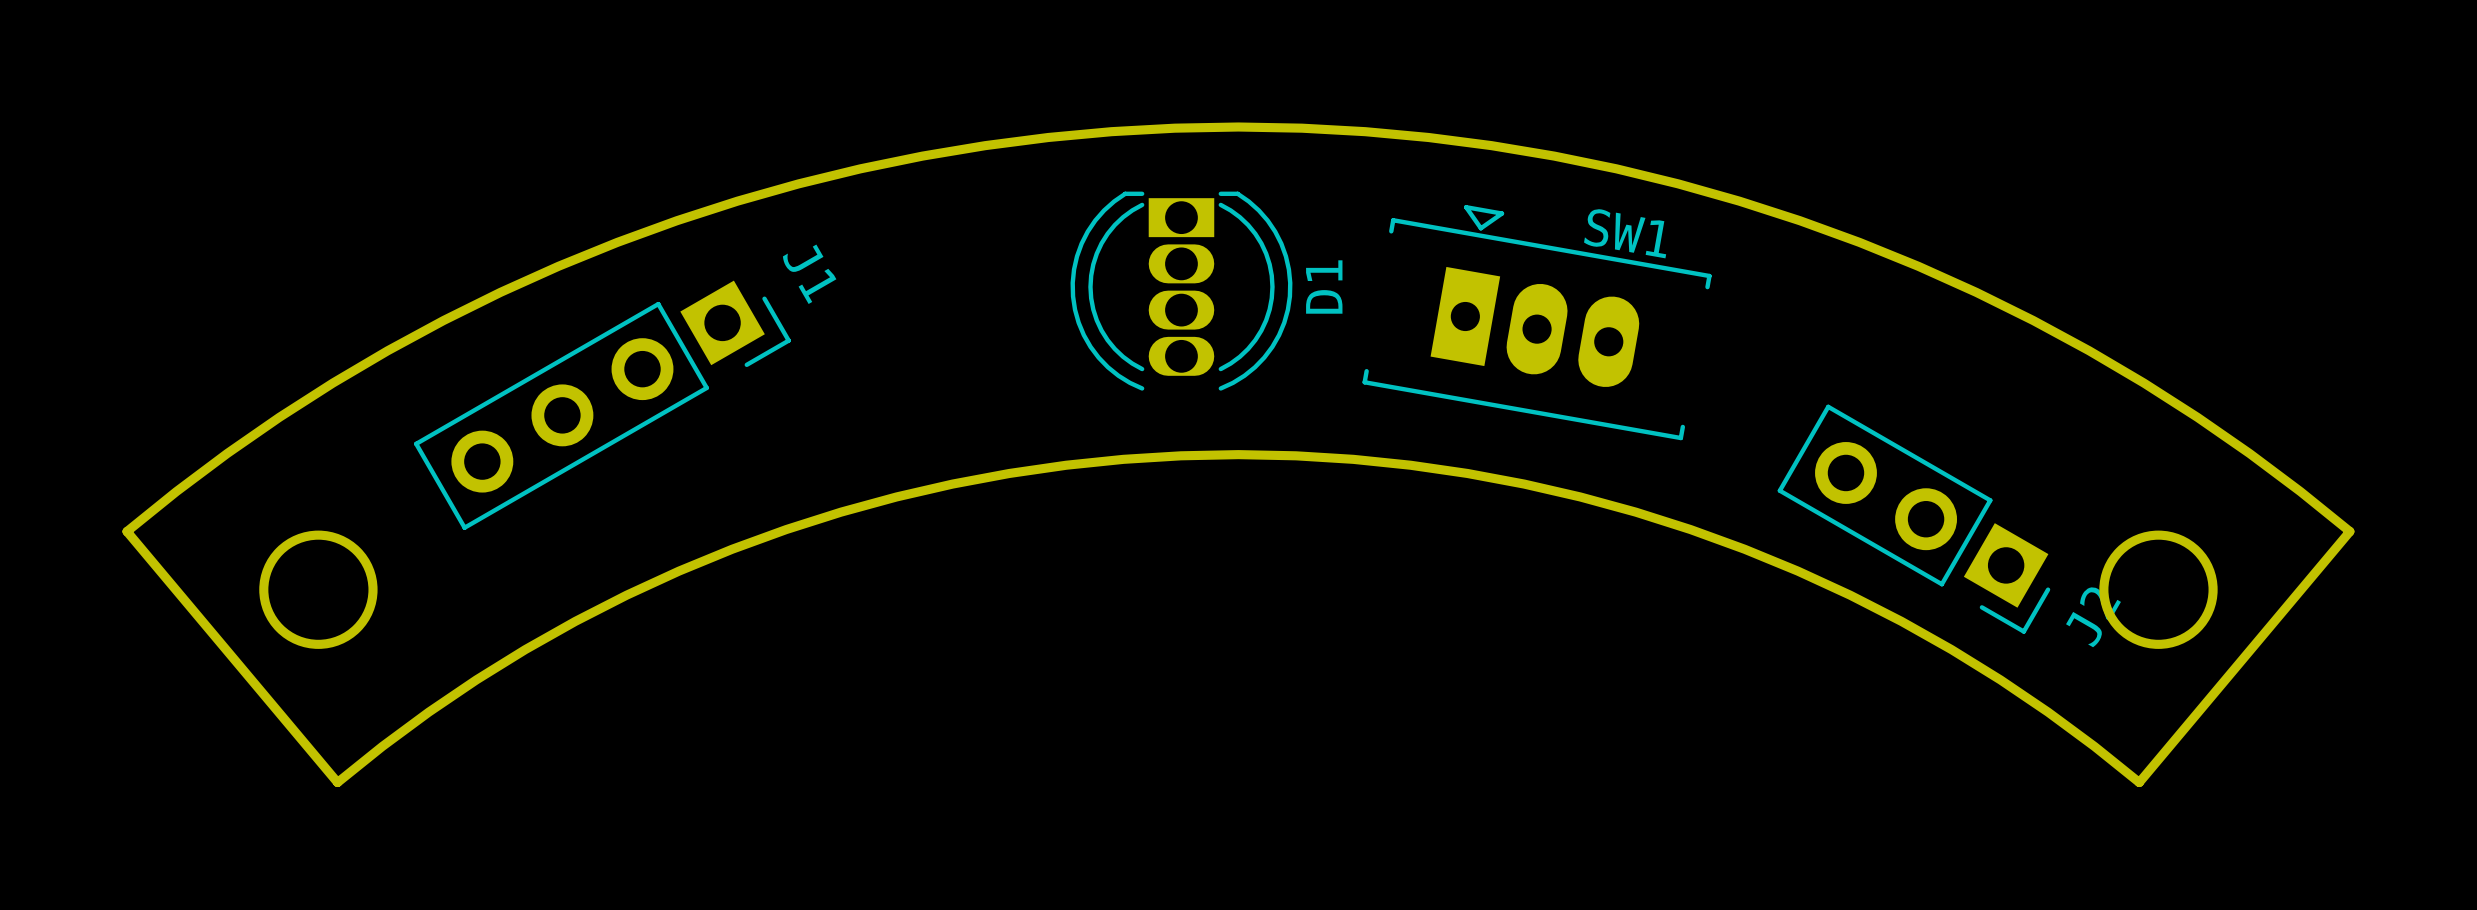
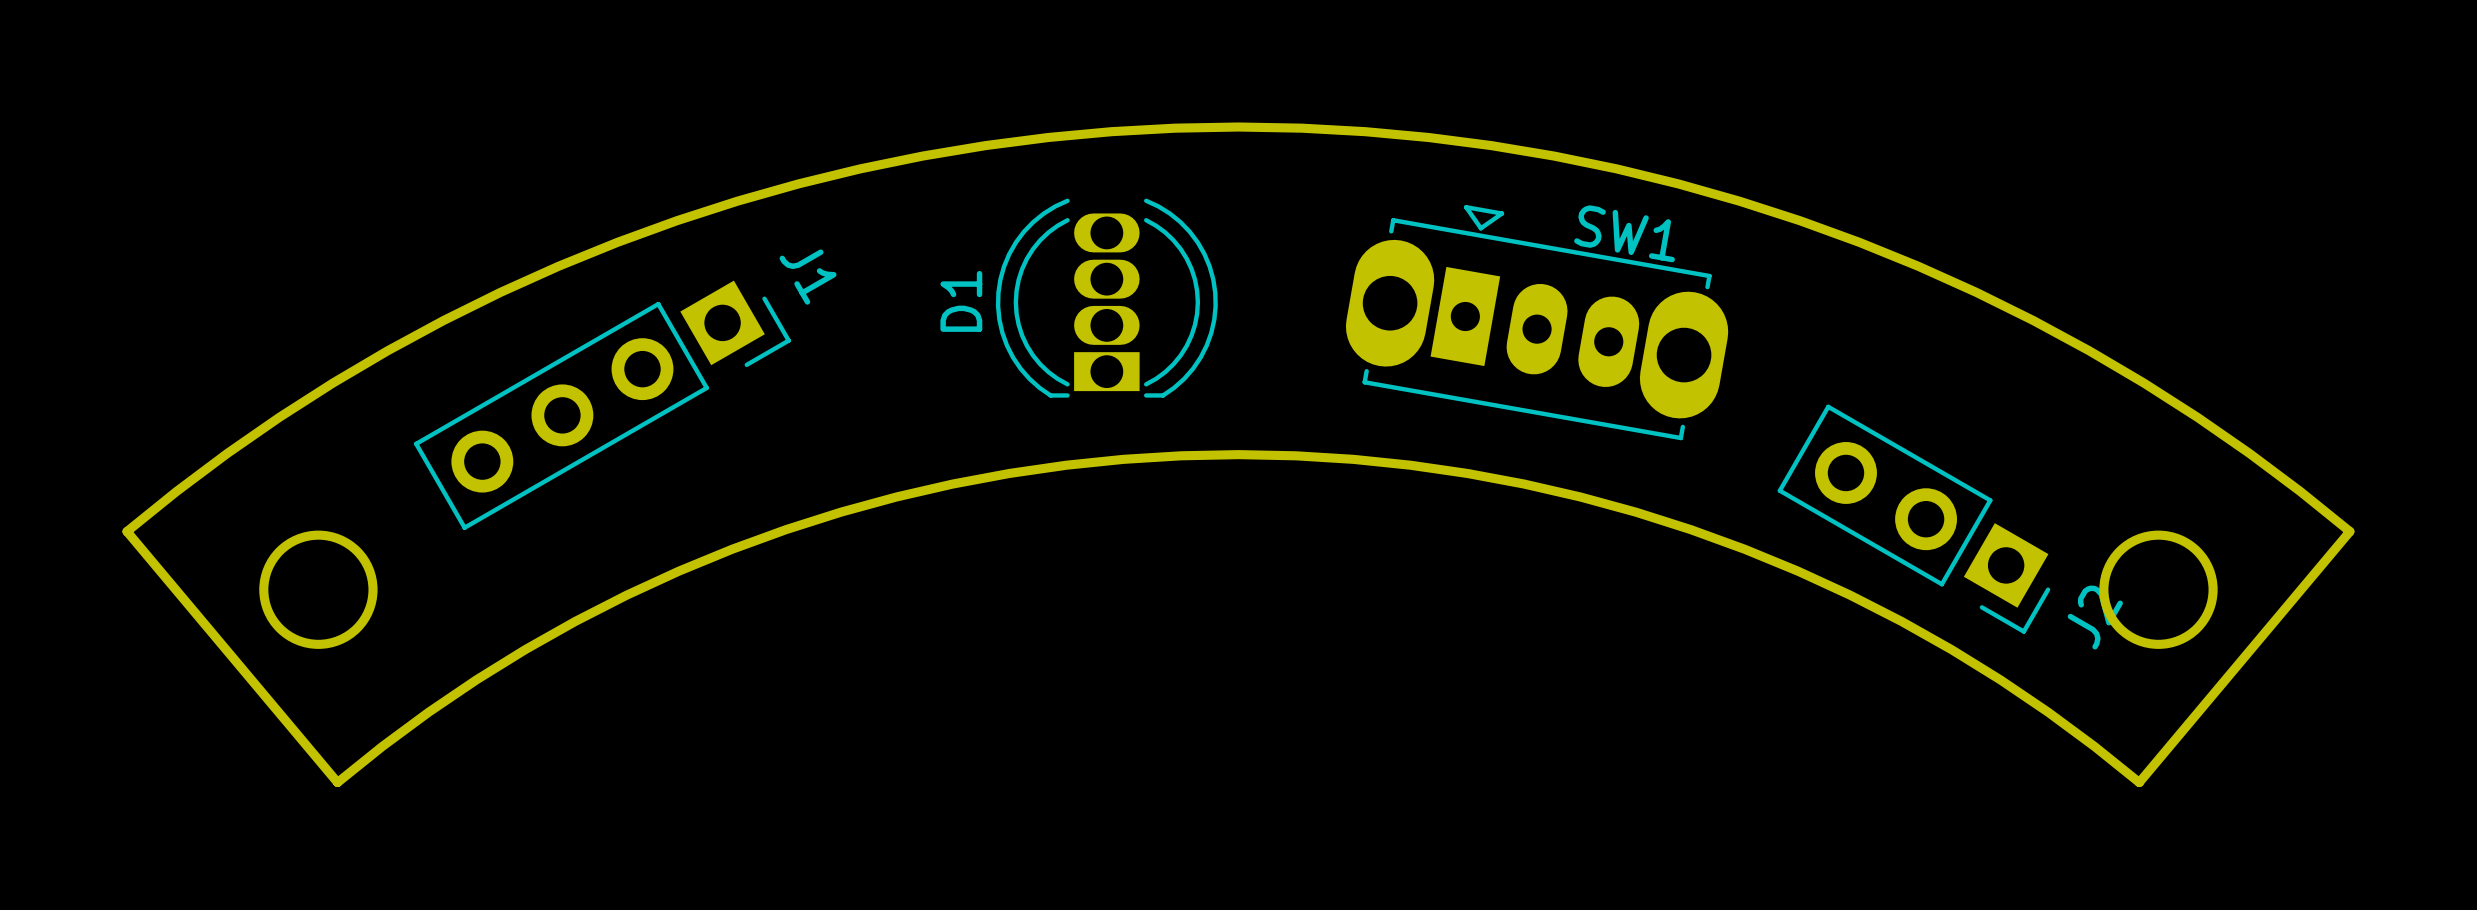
SW1 footprint: [1362, 205, 1712, 441] -> [1345, 205, 1729, 441]
D1 rotation: 0° (1181, 291) -> 180° (1106, 298)

